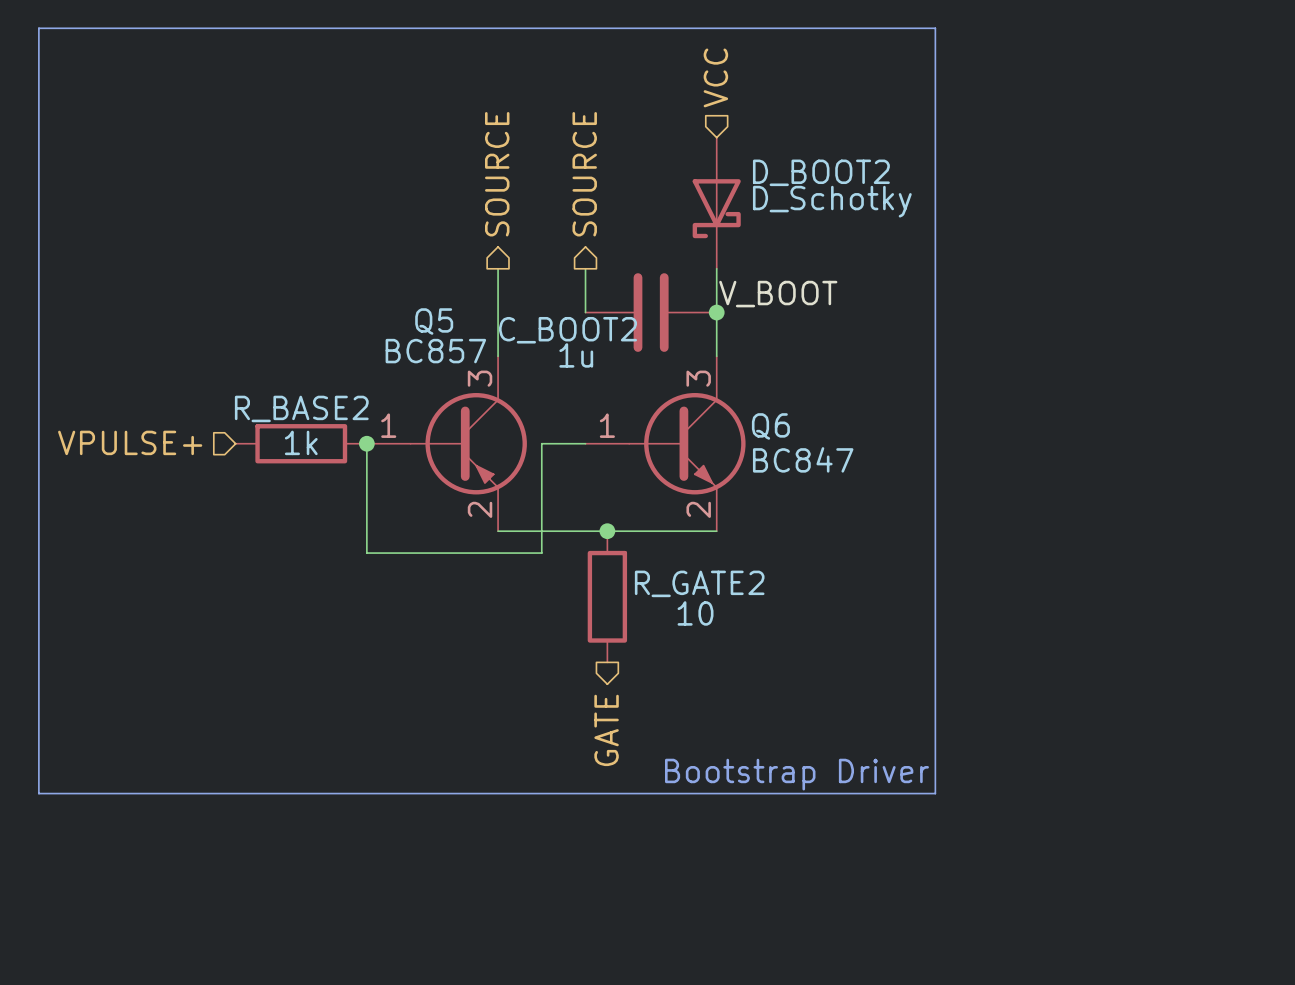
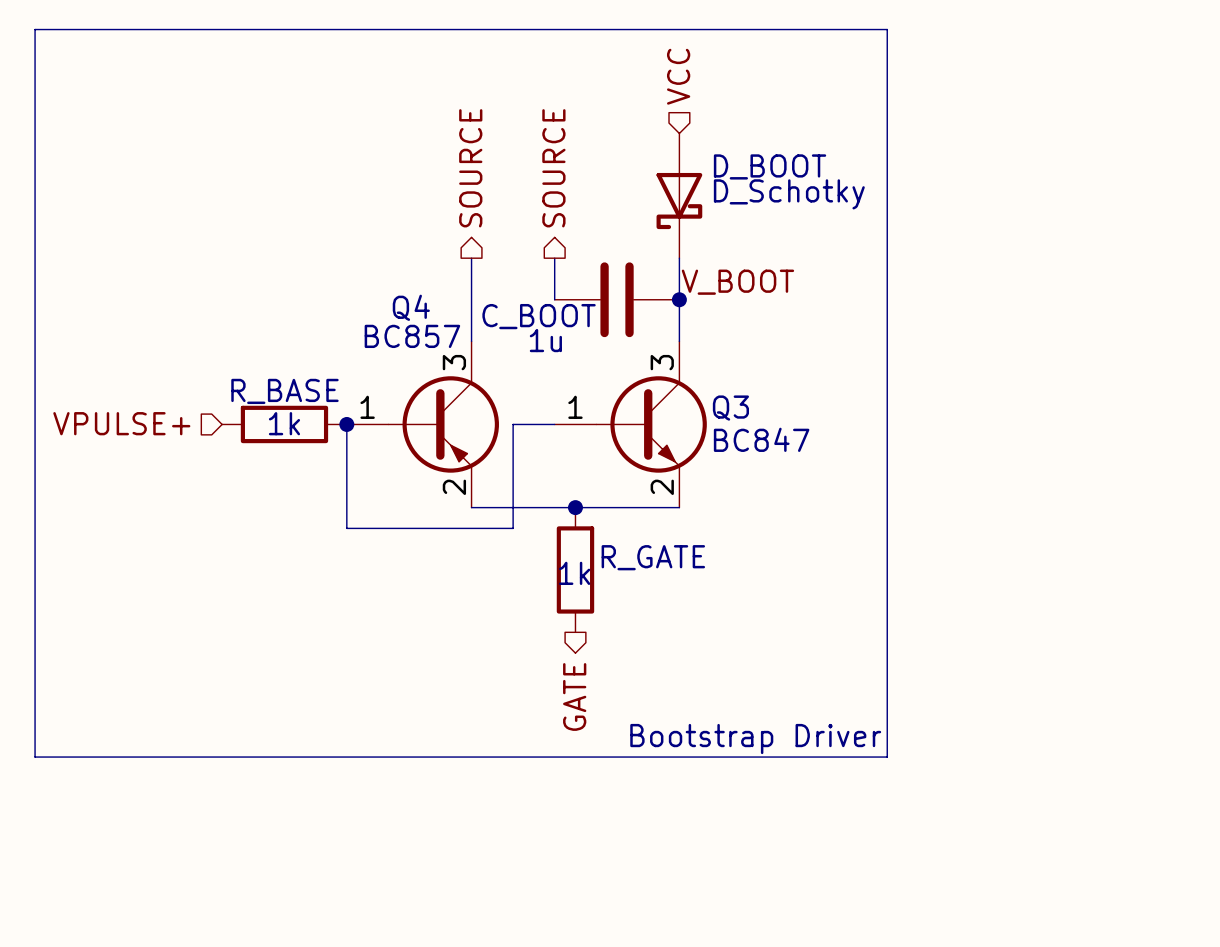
D_BOOT2 name: D_BOOT2 (821, 172) -> D_BOOT (770, 166)
Q5 name: Q5 (434, 321) -> Q4 (411, 307)
C_BOOT2 name: C_BOOT2 (568, 330) -> C_BOOT (539, 316)
R_BASE2 name: R_BASE2 (301, 408) -> R_BASE (284, 391)
Q6 name: Q6 (770, 426) -> Q3 (730, 408)
R_GATE2 name: R_GATE2 (699, 583) -> R_GATE (653, 557)
R_GATE2 value: 10 (695, 613) -> 1k (574, 573)

